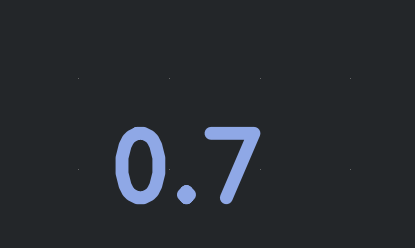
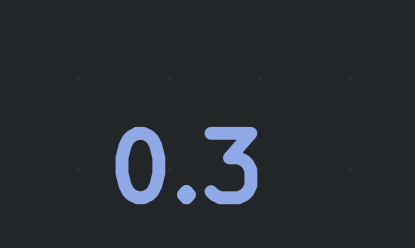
text: 0.7 (187, 165) -> 0.3 (186, 165)

